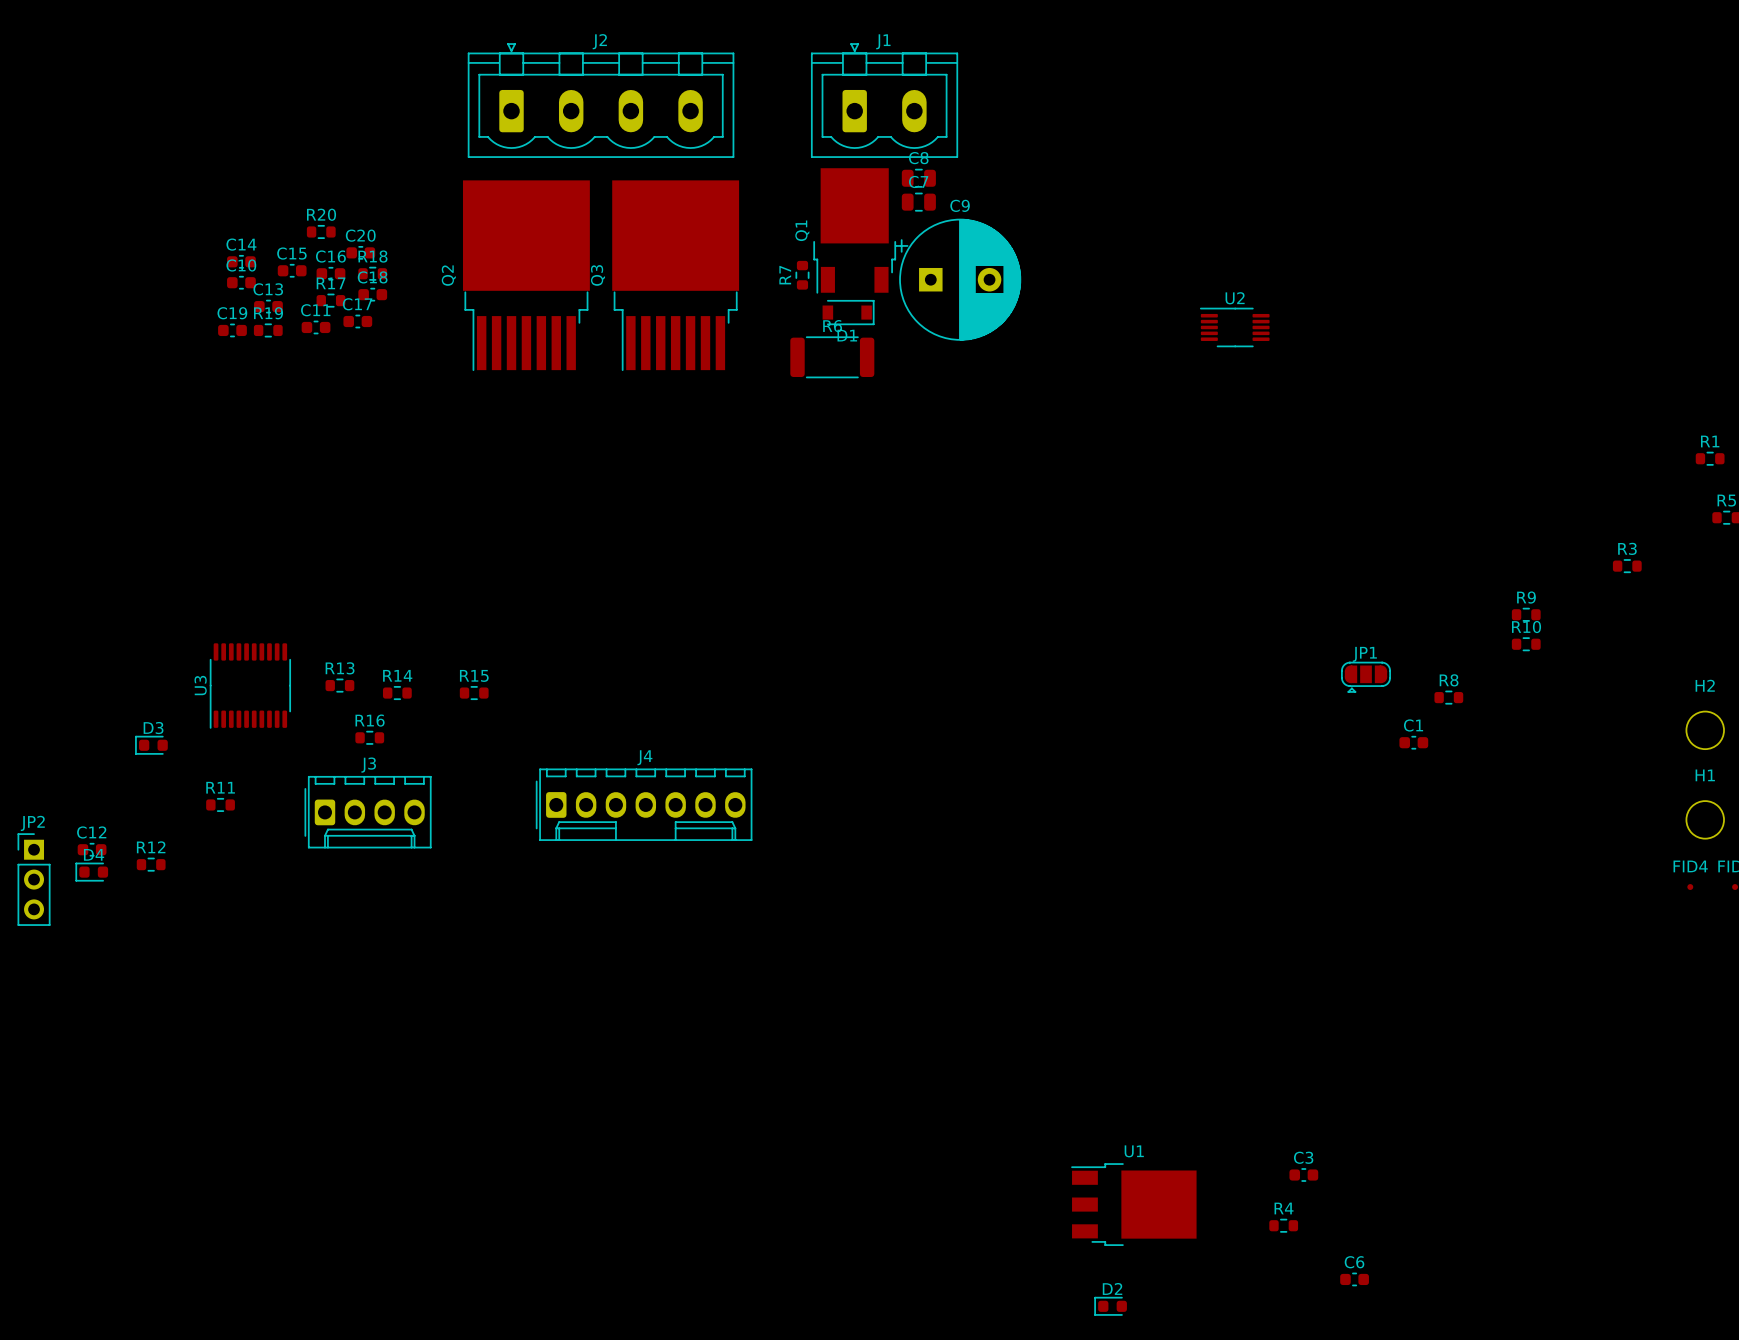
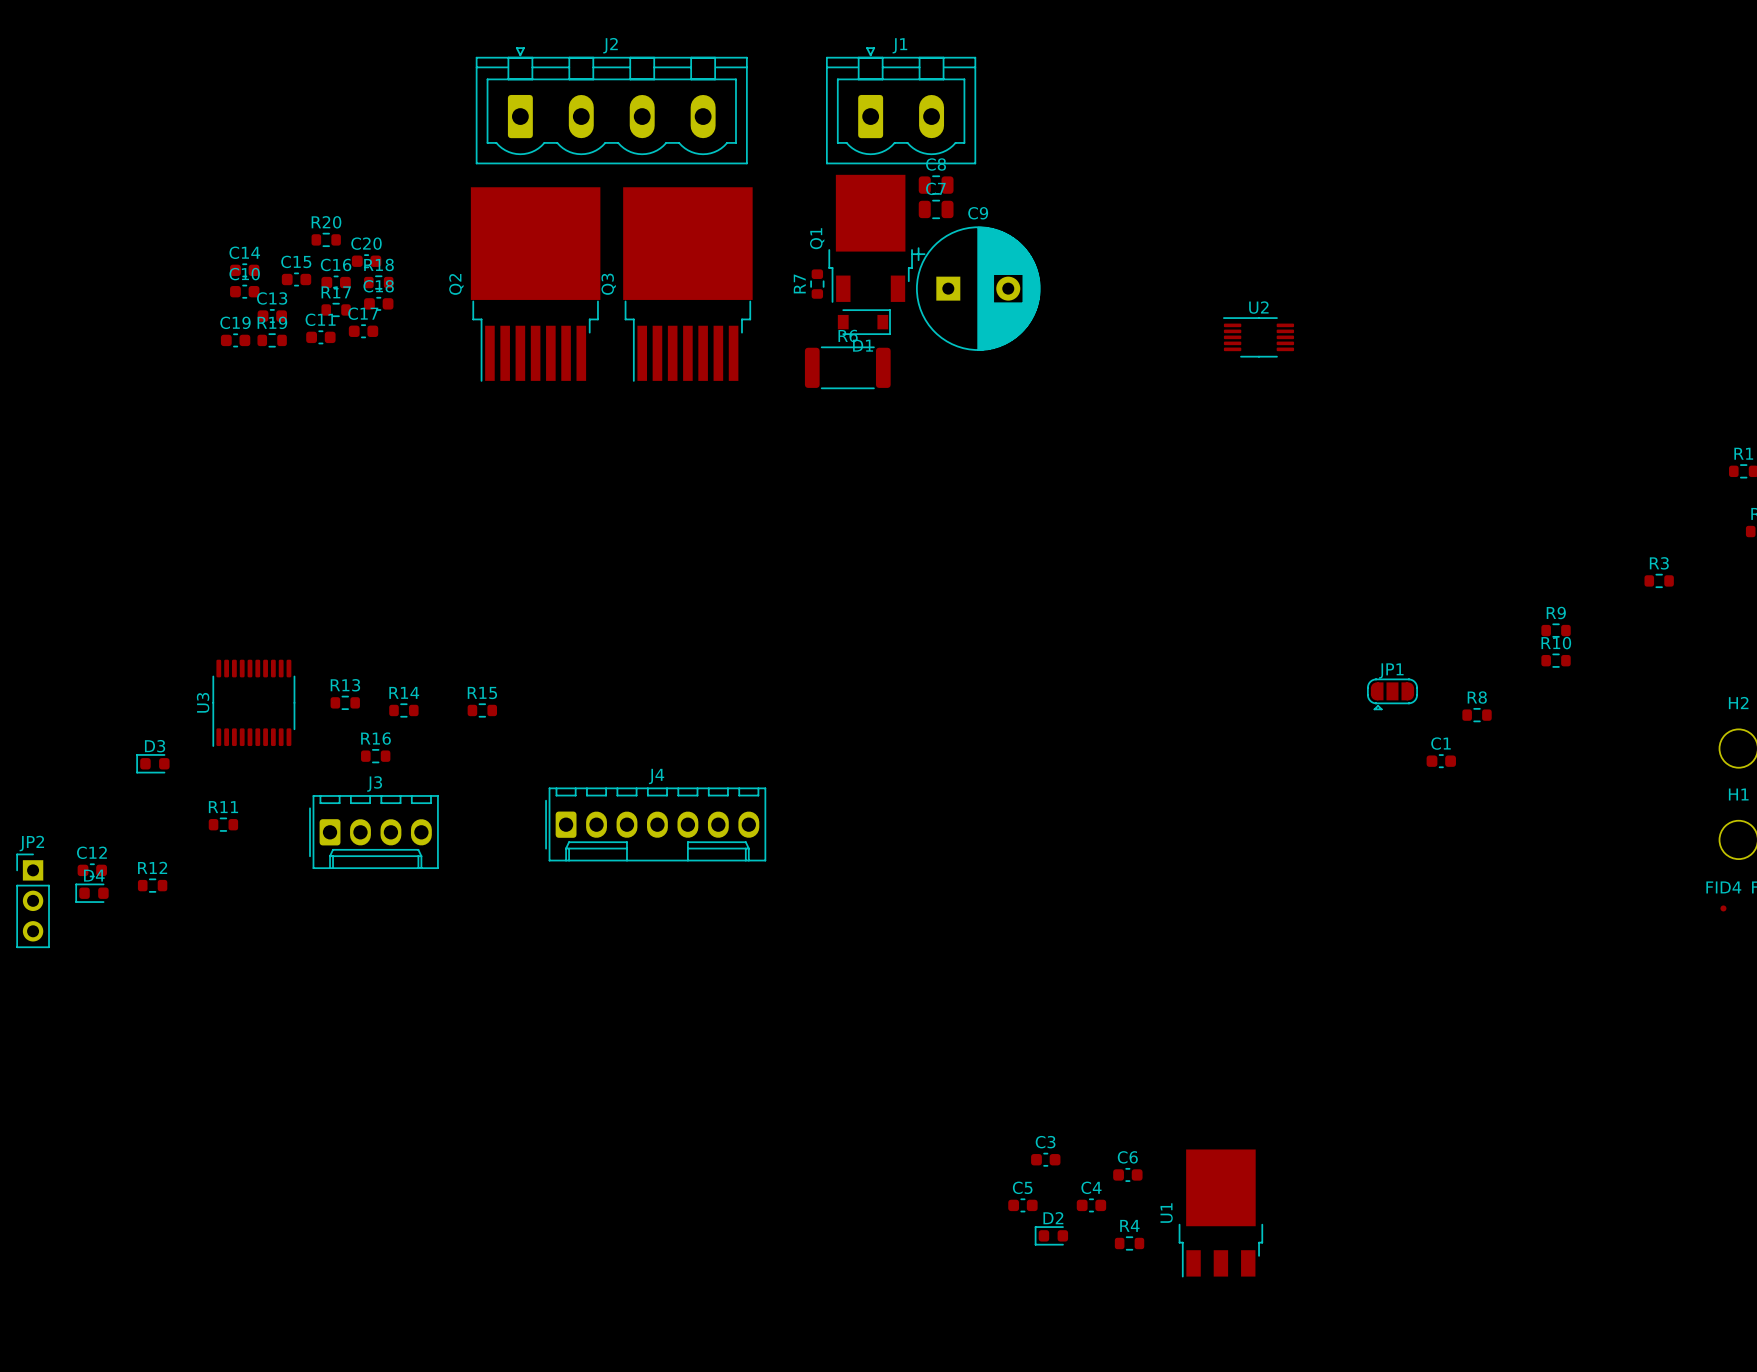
C3 position: (1303, 1175) -> (1045, 1159)
C5: none -> (1022, 1205)
C4: none -> (1091, 1205)
U1 rotation: 0° (1133, 1204) -> 90° counterclockwise (1220, 1213)
R4 position: (1283, 1225) -> (1129, 1243)
C6 position: (1354, 1279) -> (1127, 1174)
D2 position: (1110, 1306) -> (1051, 1235)

